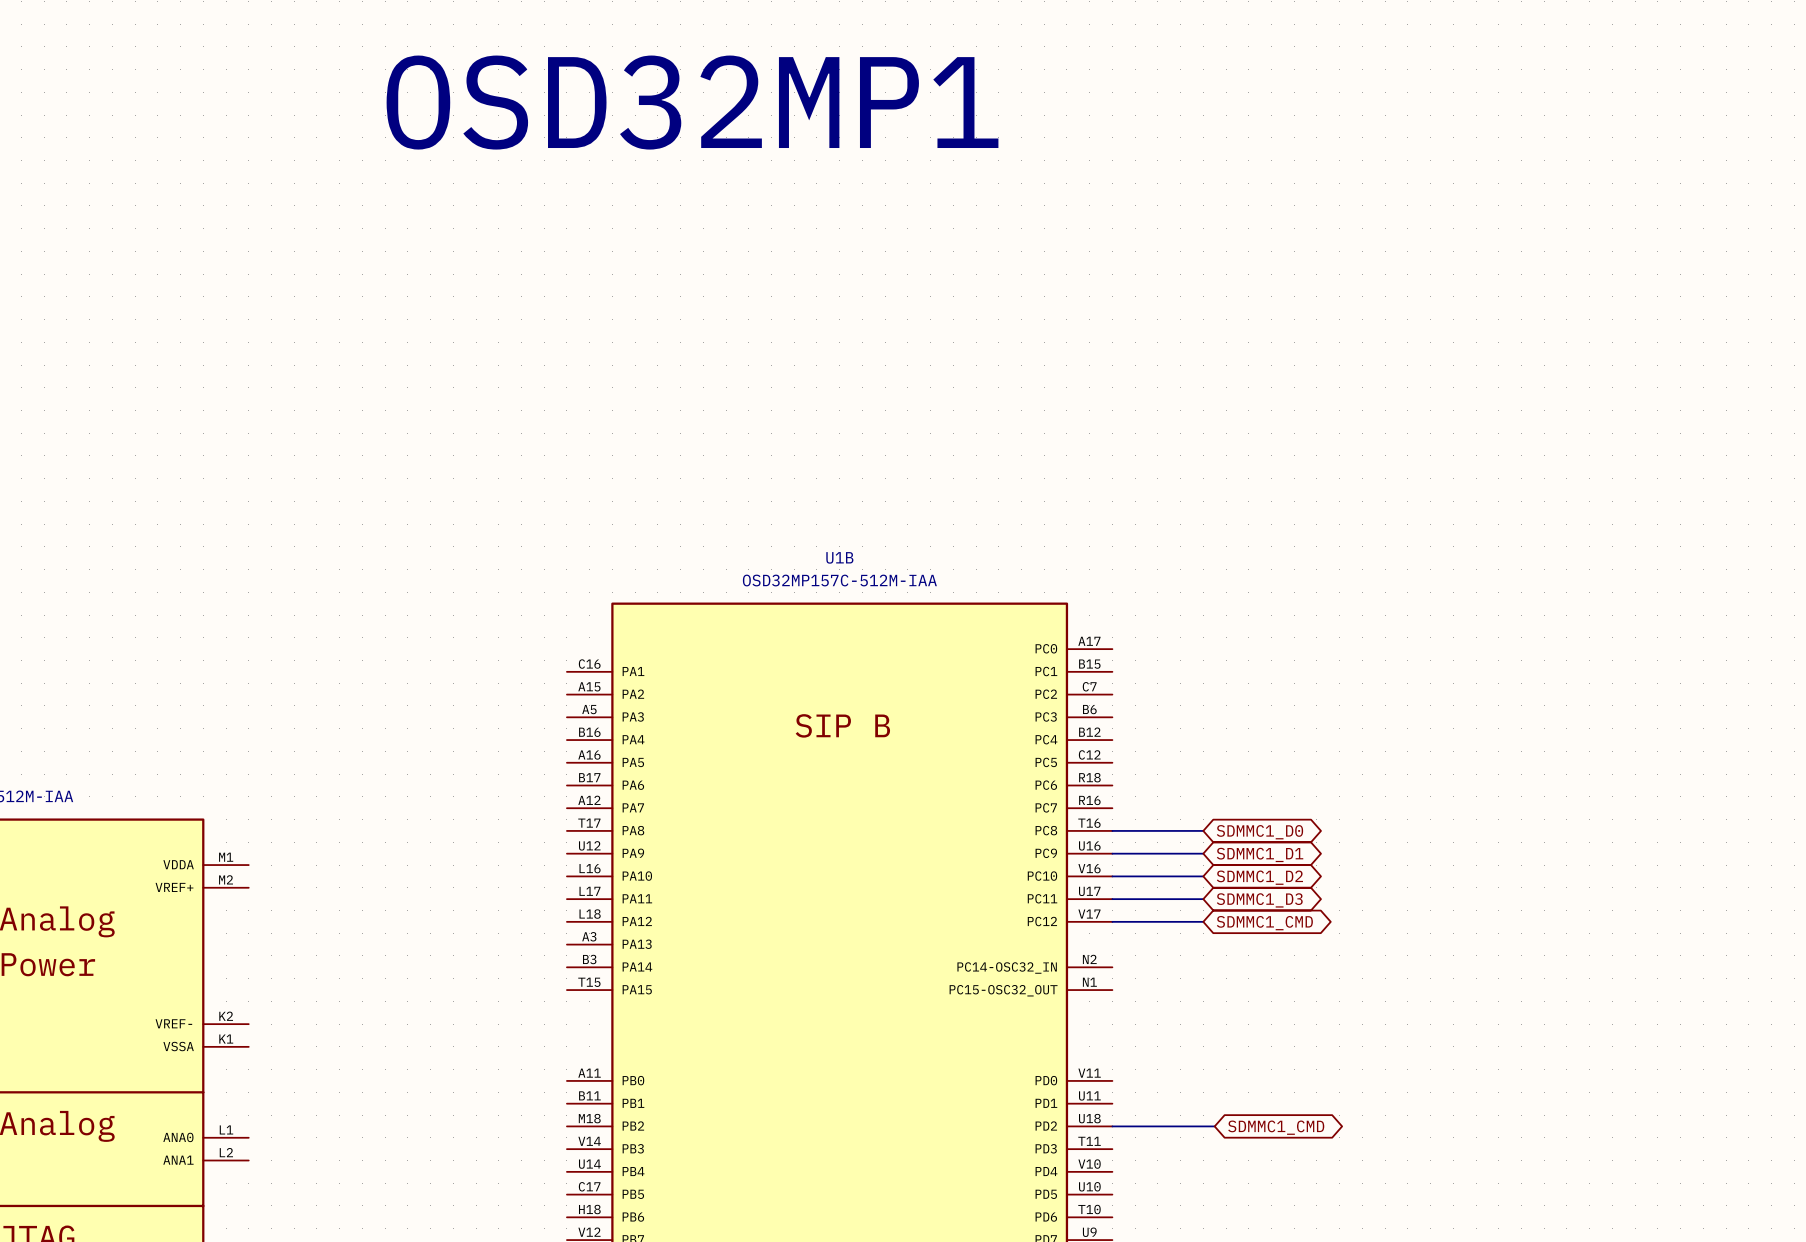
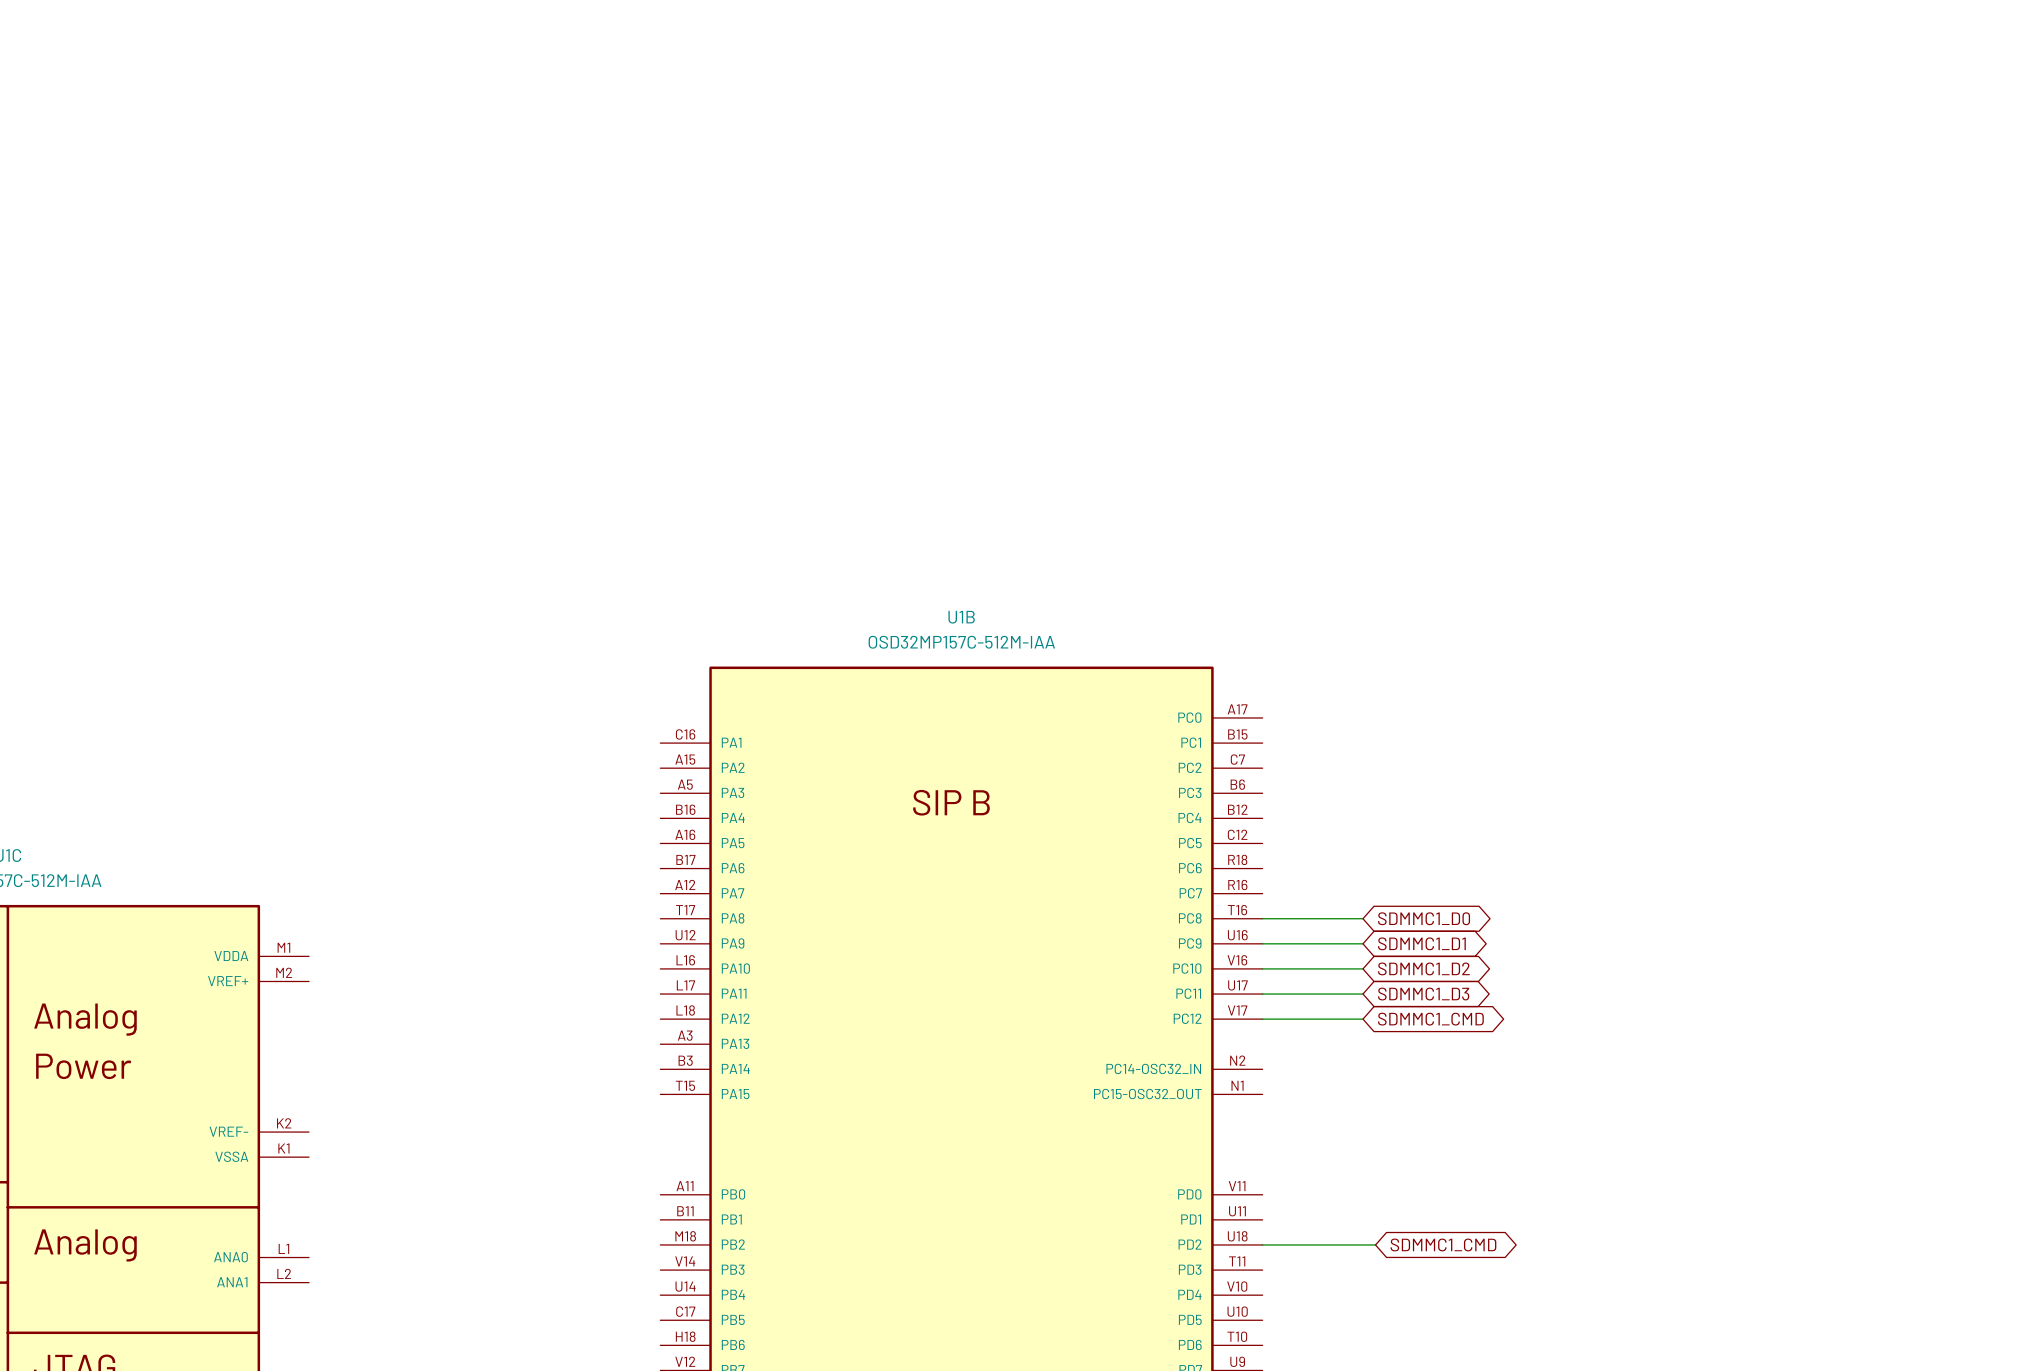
text: OSD32MP1 (692, 102) -> none

